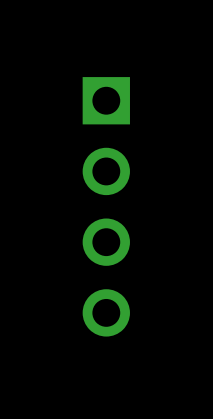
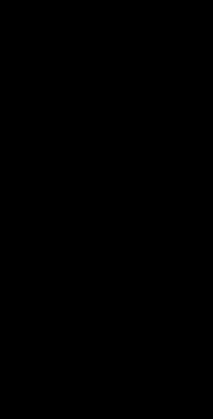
part: (106, 206) -> none

